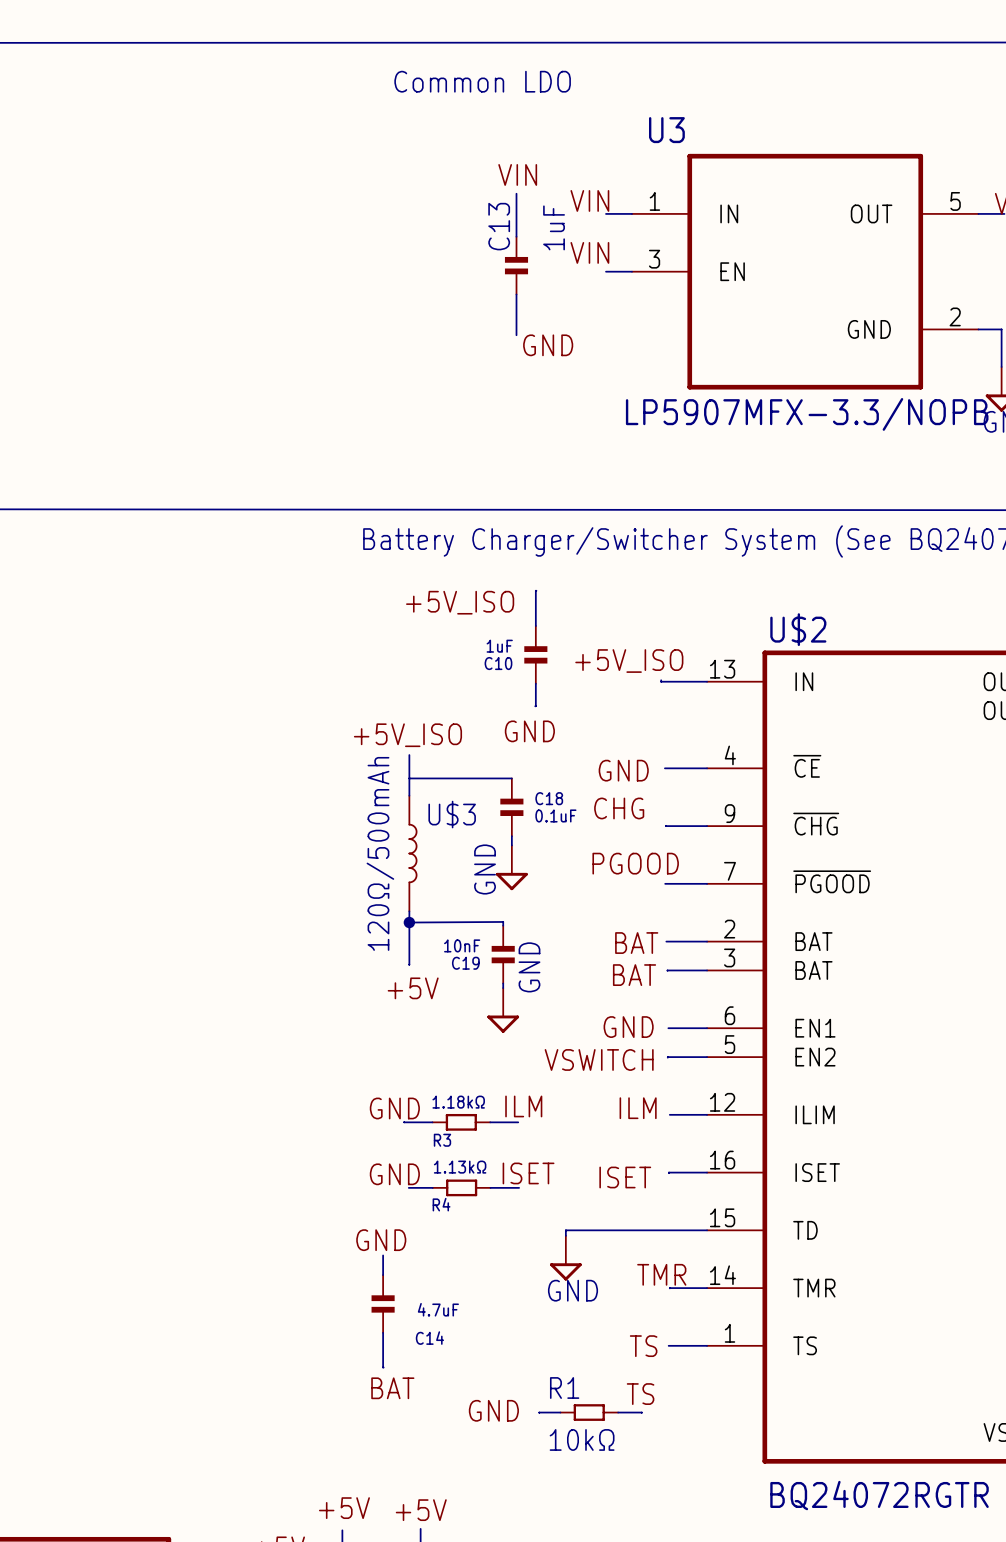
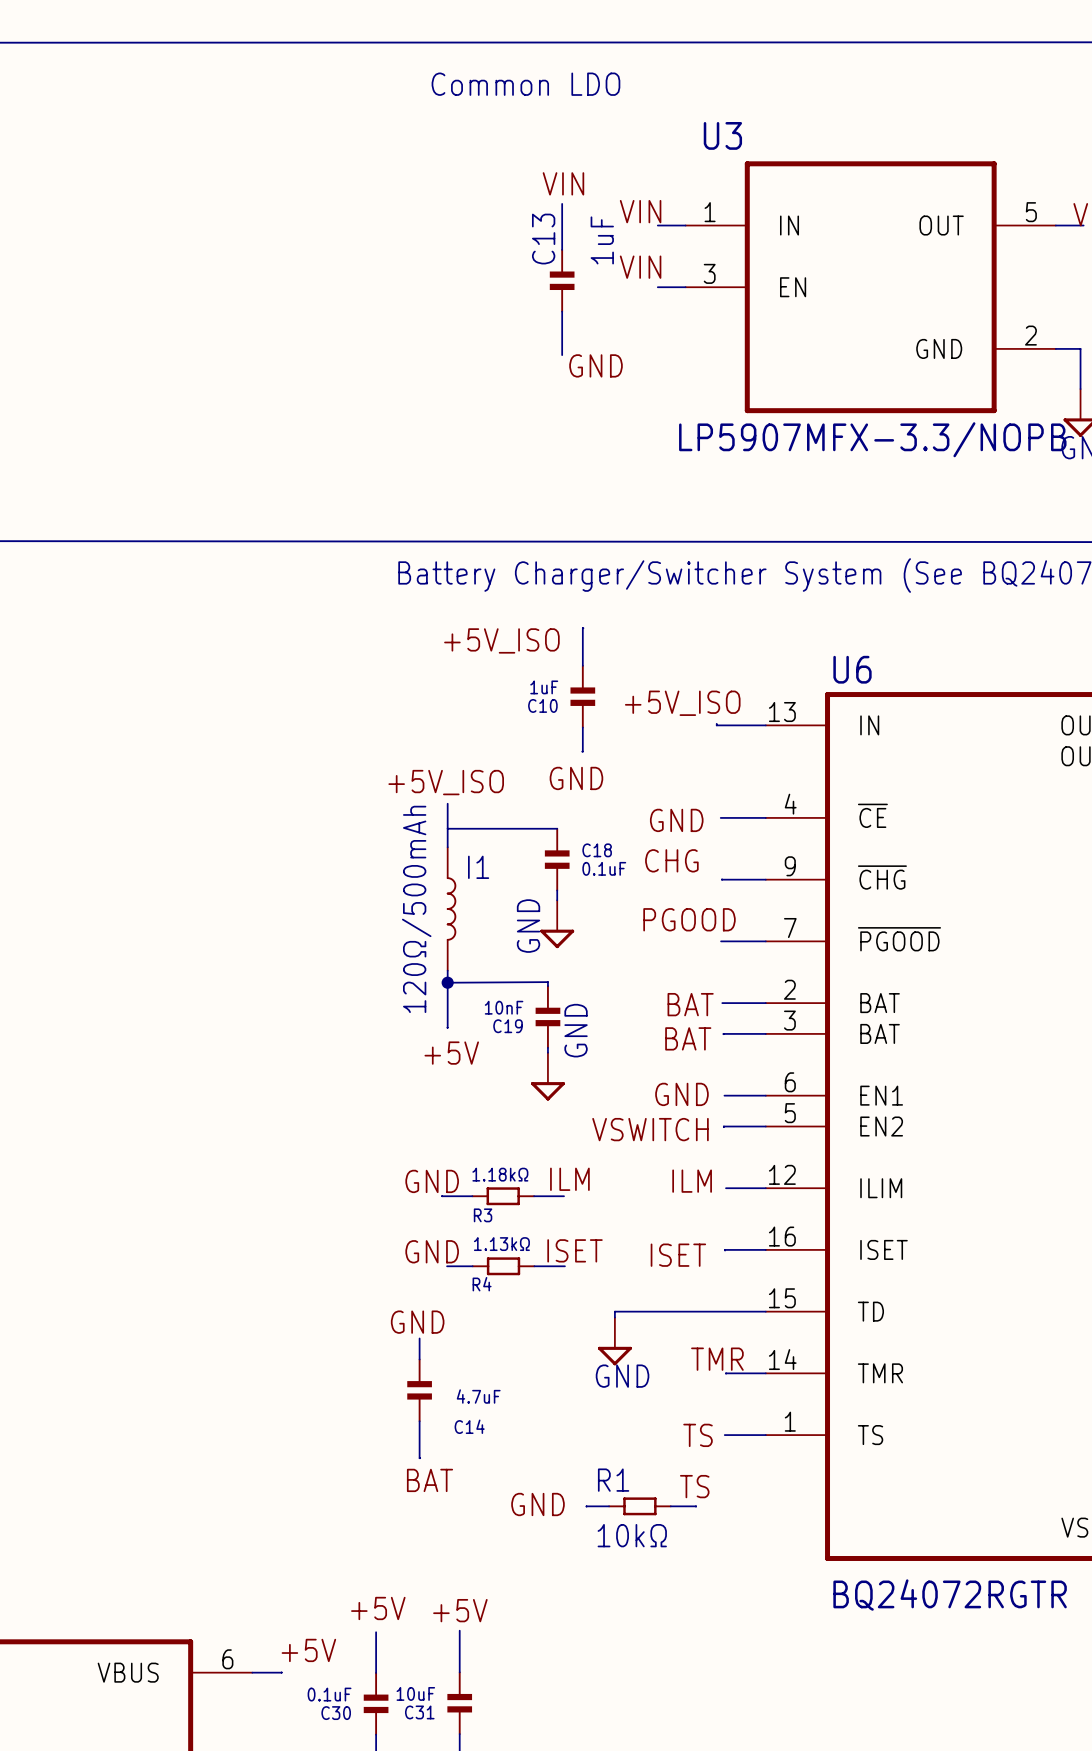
U$2 name: U$2 (798, 629) -> U6 (852, 669)
U$3 name: U$3 (452, 814) -> I1 (478, 867)

